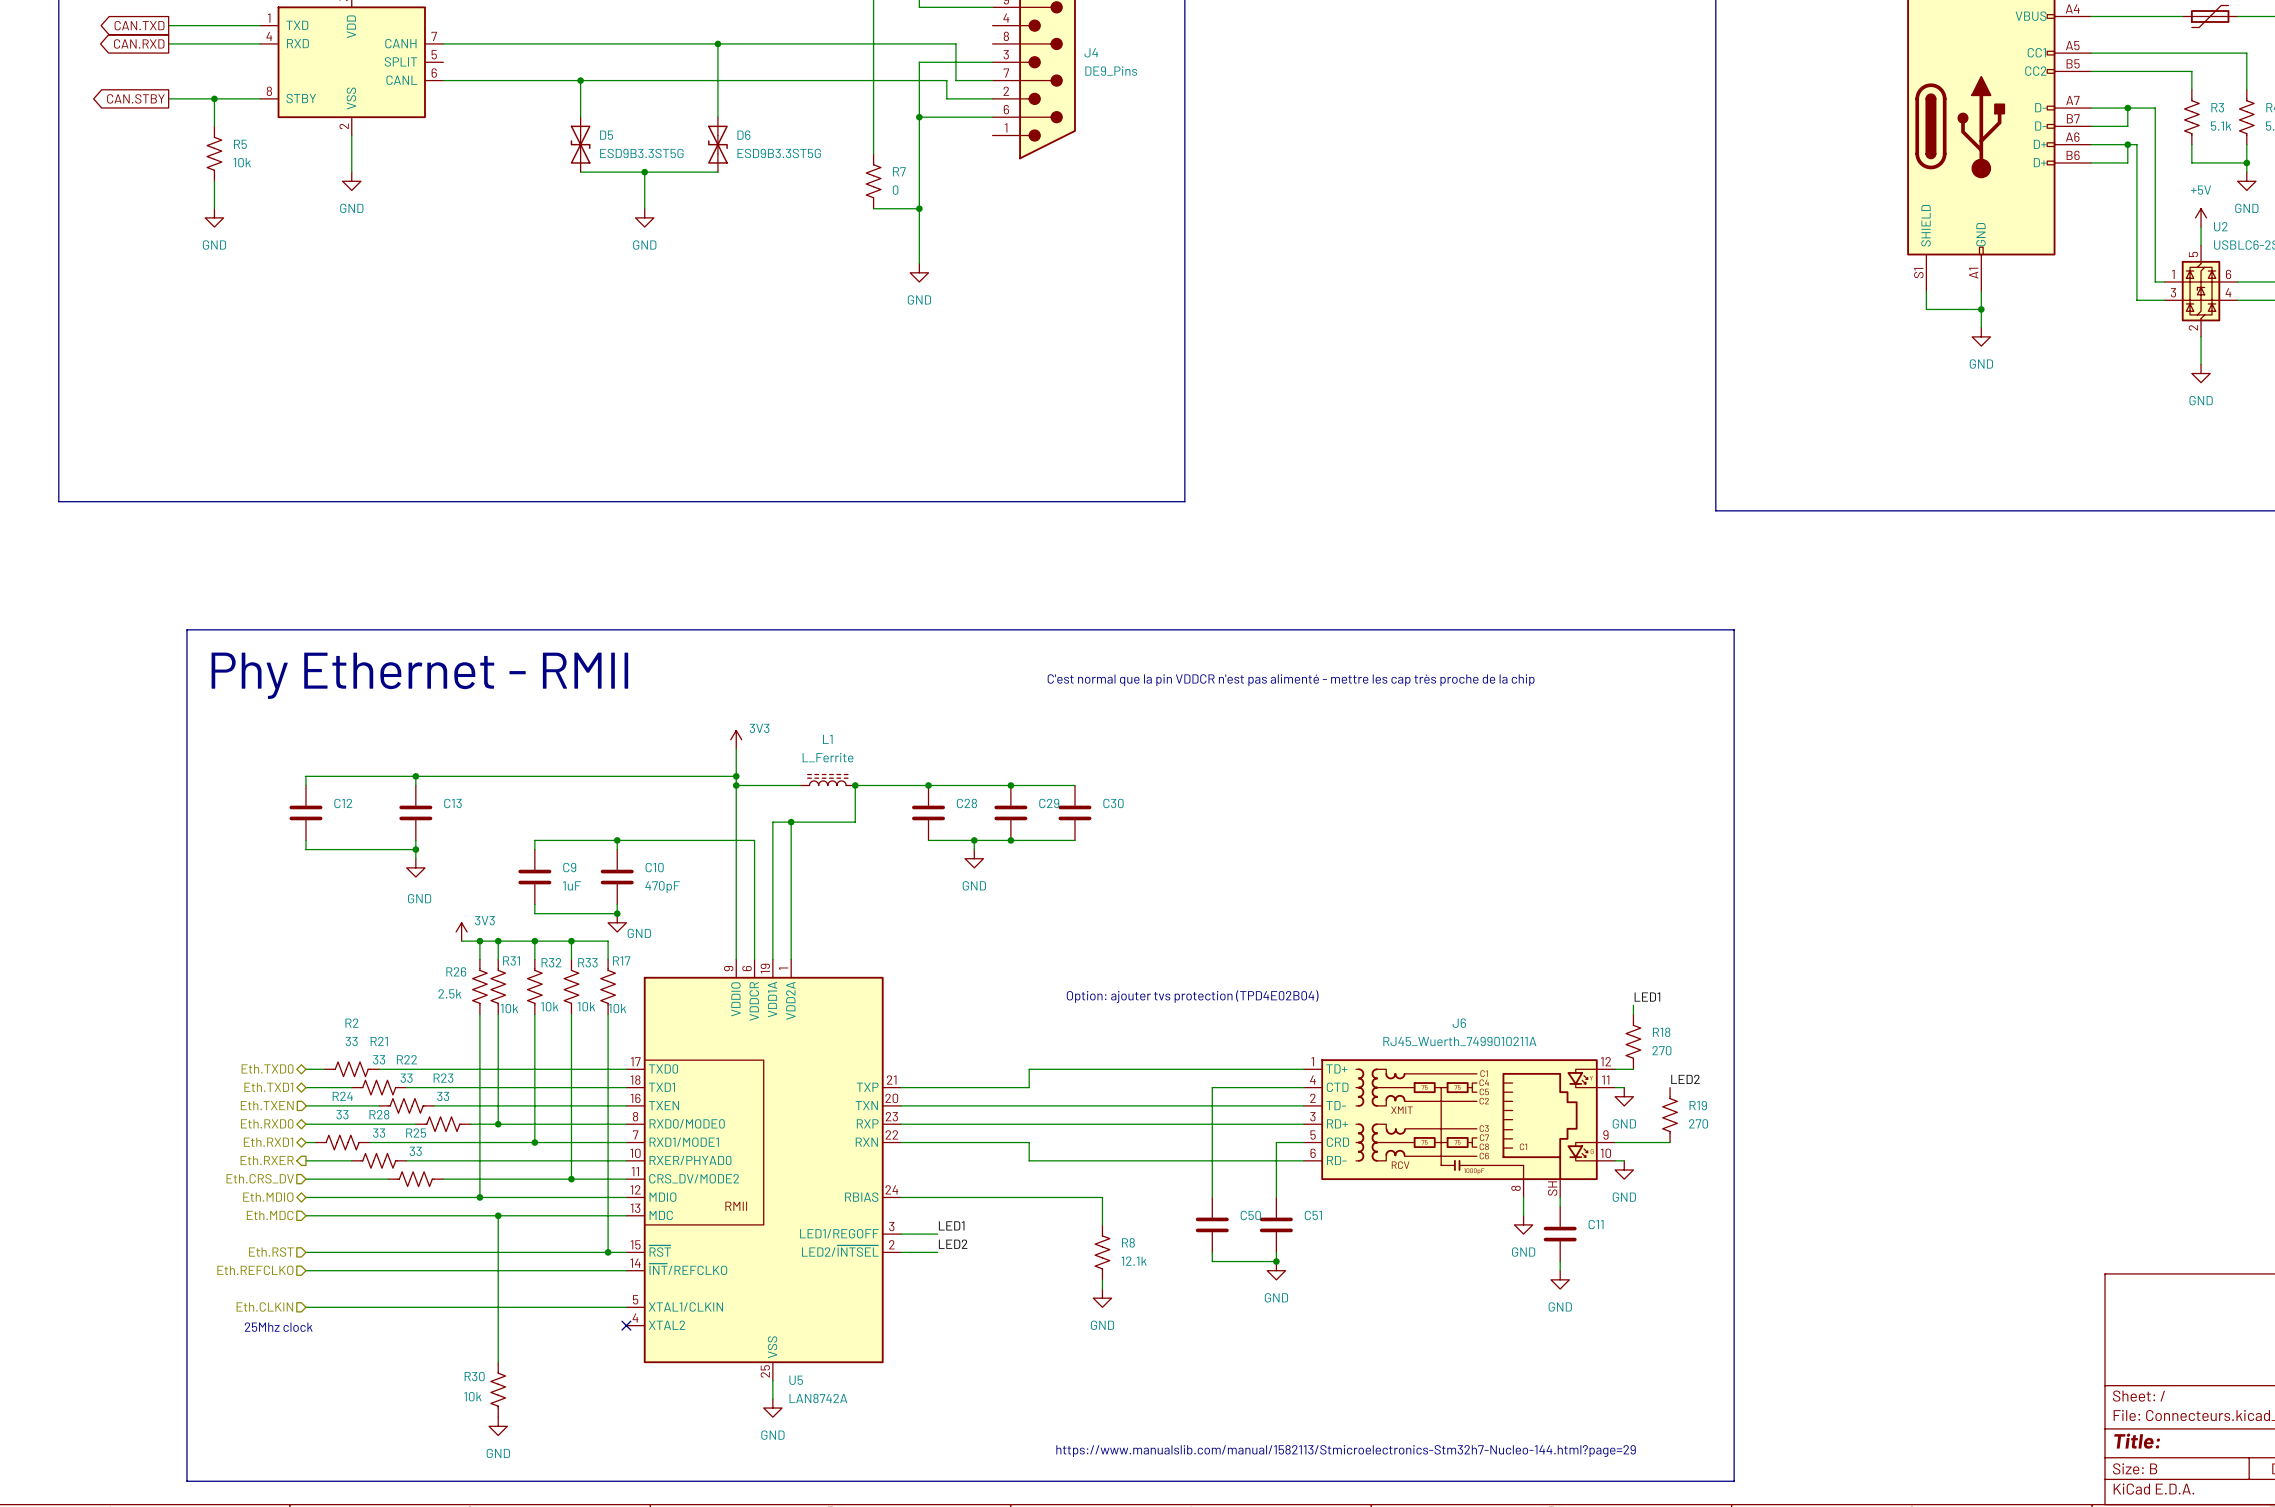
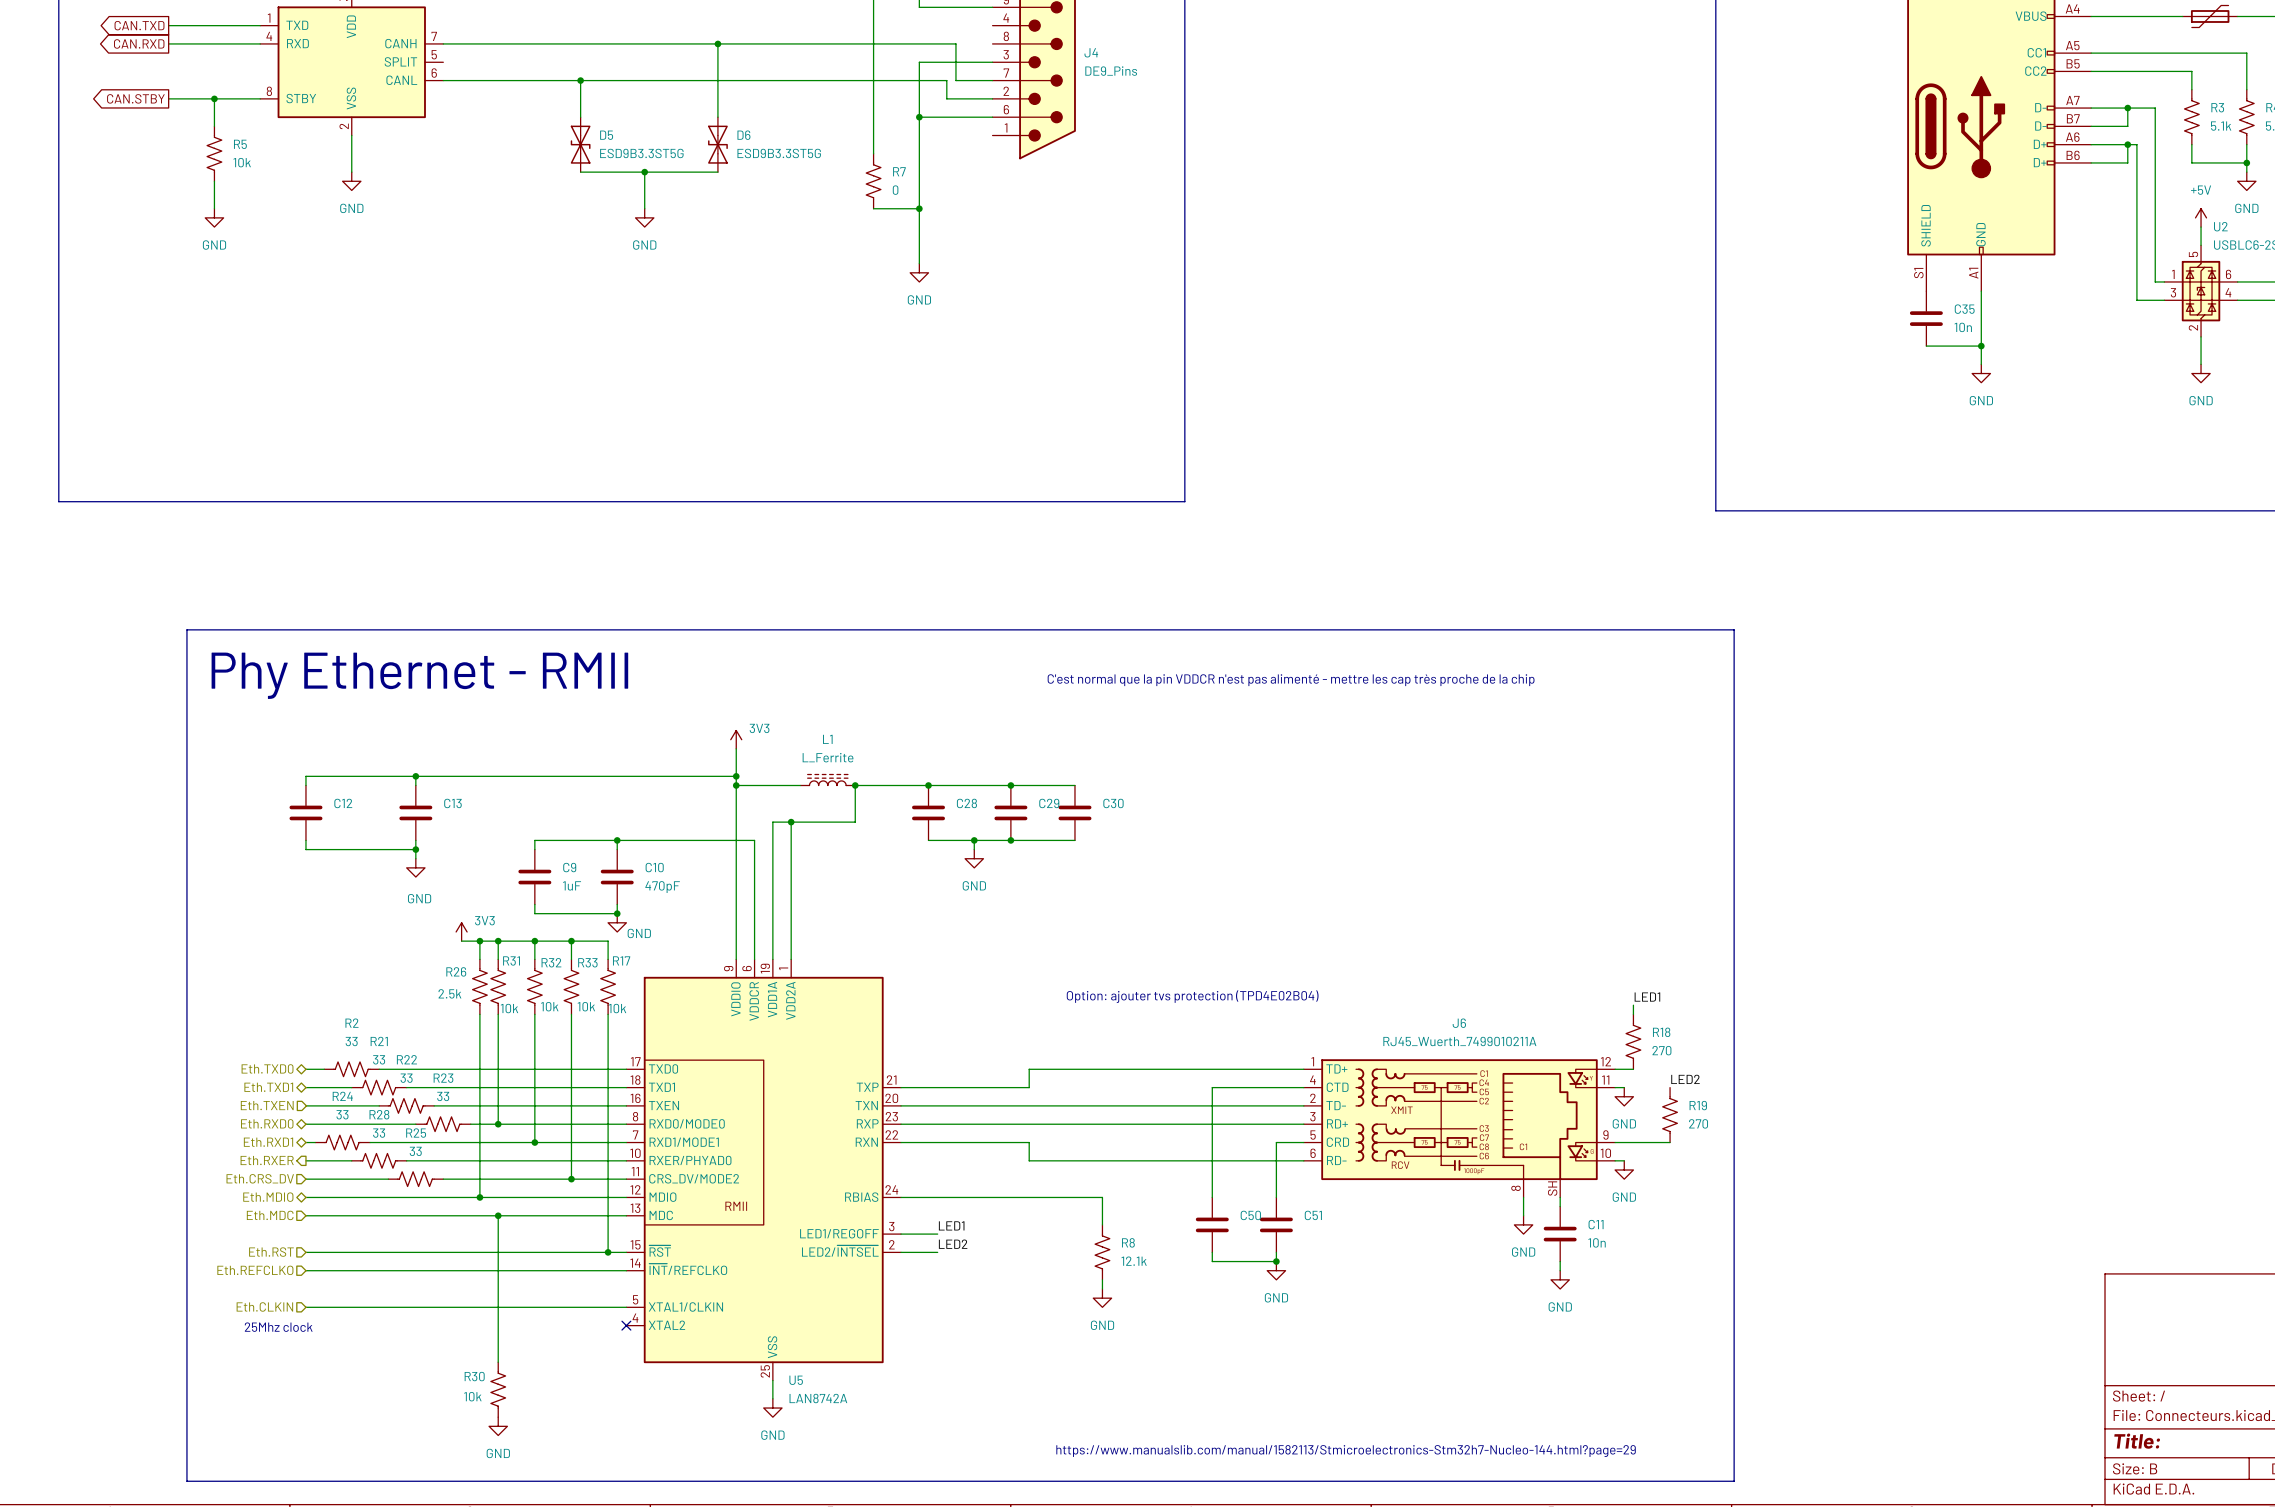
wire: (1926, 291) (1926, 309) (1981, 309) -> none
junction position: (1981, 309) -> (1981, 346)
C35: none -> 10n (1926, 318)
wire: none -> (1981, 327) (1981, 364)
power symbol position: GND (1981, 336) -> GND (1981, 373)
wire: none -> (1926, 346) (1981, 346)
C11 value: none -> 10n (1597, 1242)

